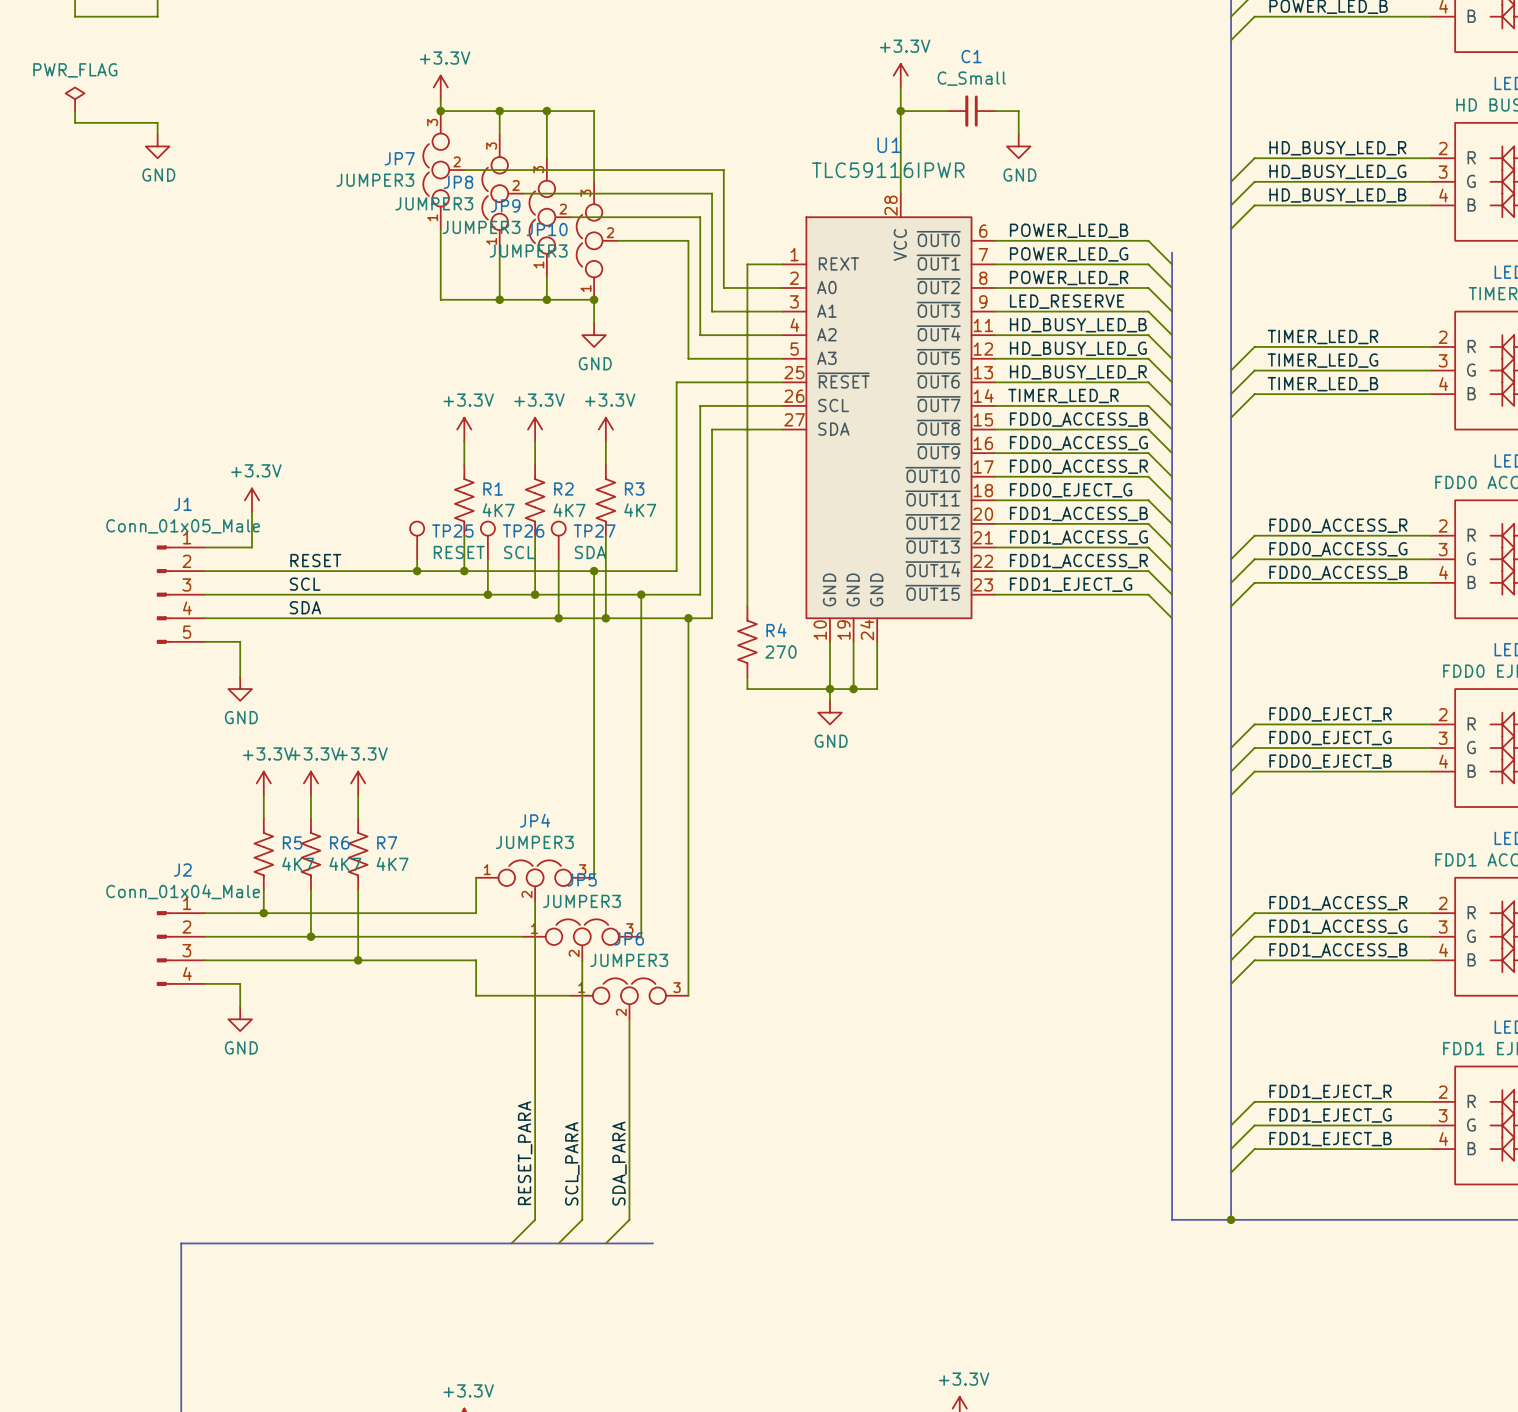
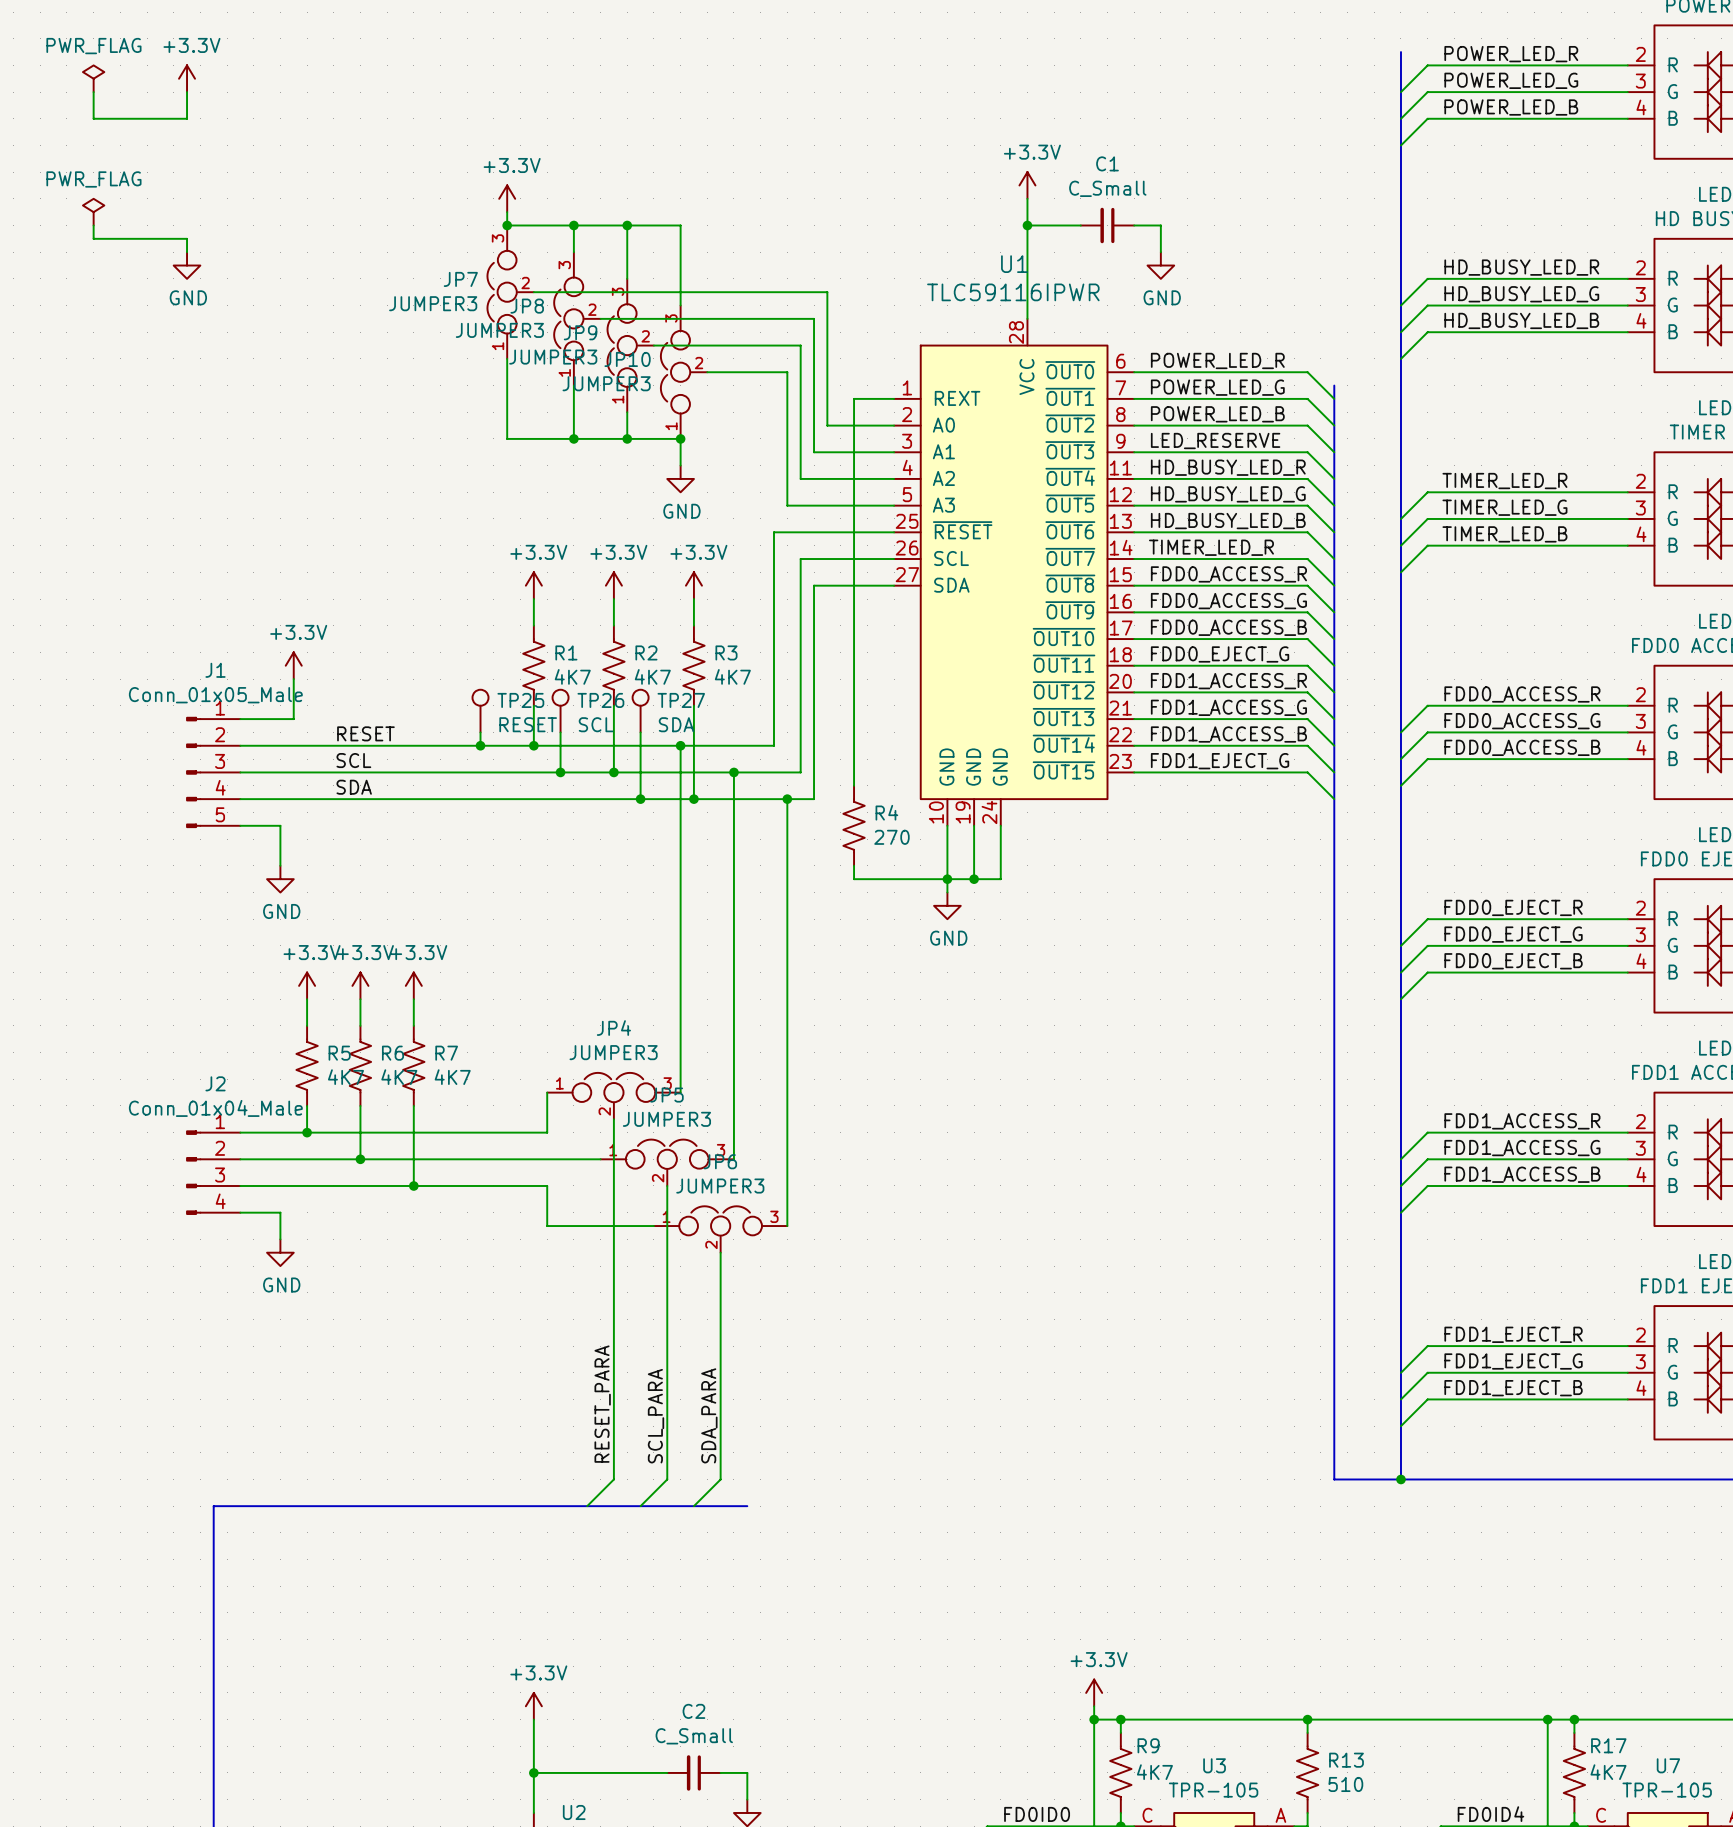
label: POWER_LED_B (1069, 230) -> POWER_LED_R (1217, 360)
label: POWER_LED_R (1069, 278) -> POWER_LED_B (1217, 414)
label: HD_BUSY_LED_B (1078, 325) -> HD_BUSY_LED_R (1228, 467)
label: HD_BUSY_LED_R (1078, 372) -> HD_BUSY_LED_B (1228, 521)
label: FDD0_ACCESS_B (1078, 419) -> FDD0_ACCESS_R (1228, 574)
label: FDD0_ACCESS_R (1078, 466) -> FDD0_ACCESS_B (1228, 627)
label: FDD1_ACCESS_B (1078, 513) -> FDD1_ACCESS_R (1228, 681)
label: FDD1_ACCESS_R (1078, 561) -> FDD1_ACCESS_B (1228, 734)

